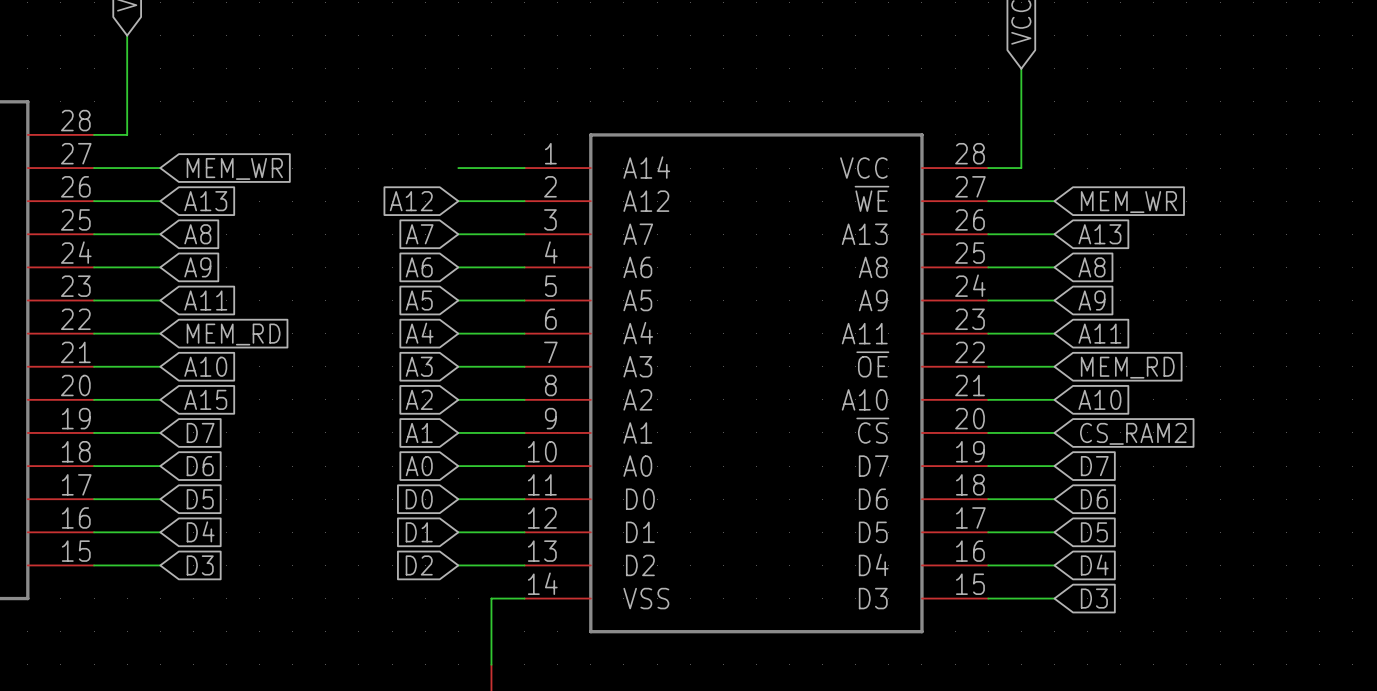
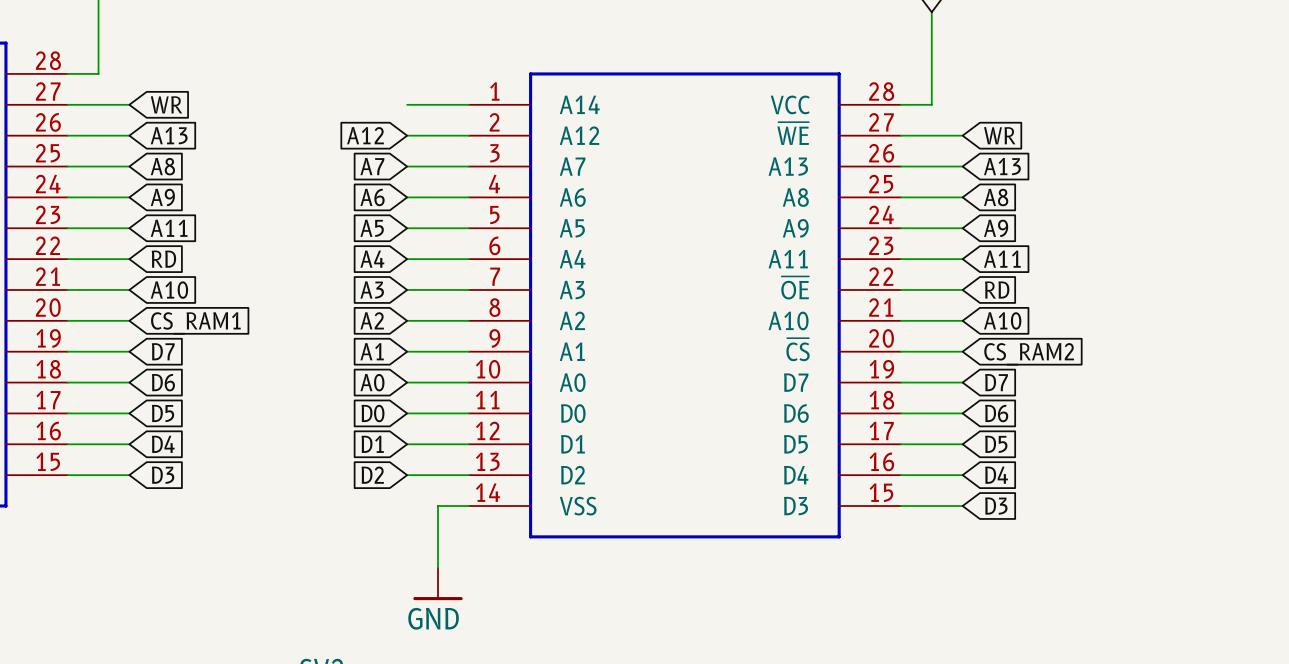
global label: MEM_WR (234, 168) -> WR (166, 104)
global label: MEM_WR (1128, 202) -> WR (999, 135)
global label: MEM_RD (233, 334) -> RD (163, 259)
global label: MEM_RD (1127, 367) -> RD (997, 290)
global label: A15 (205, 399) -> CS_RAM1 (195, 323)

